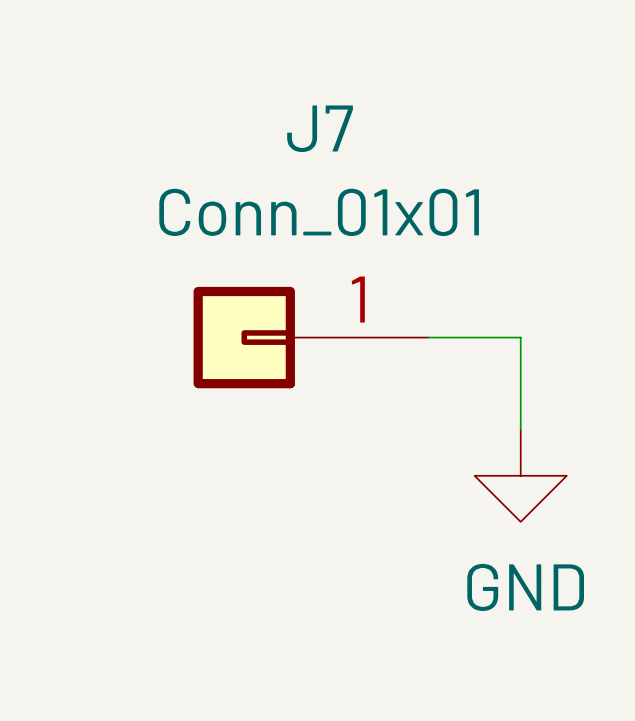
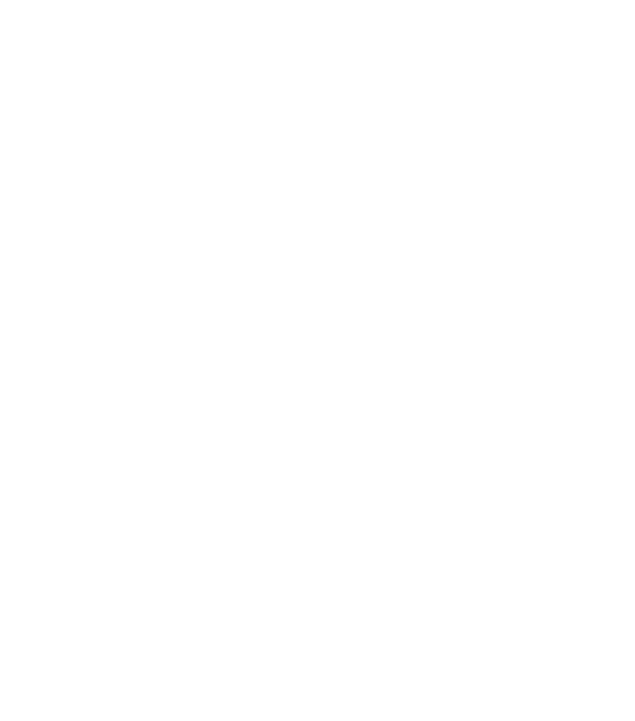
J7: Conn_01x01 (311, 337) -> none
wire: (428, 337) (520, 337) (520, 429) -> none
power symbol: GND (520, 475) -> none

